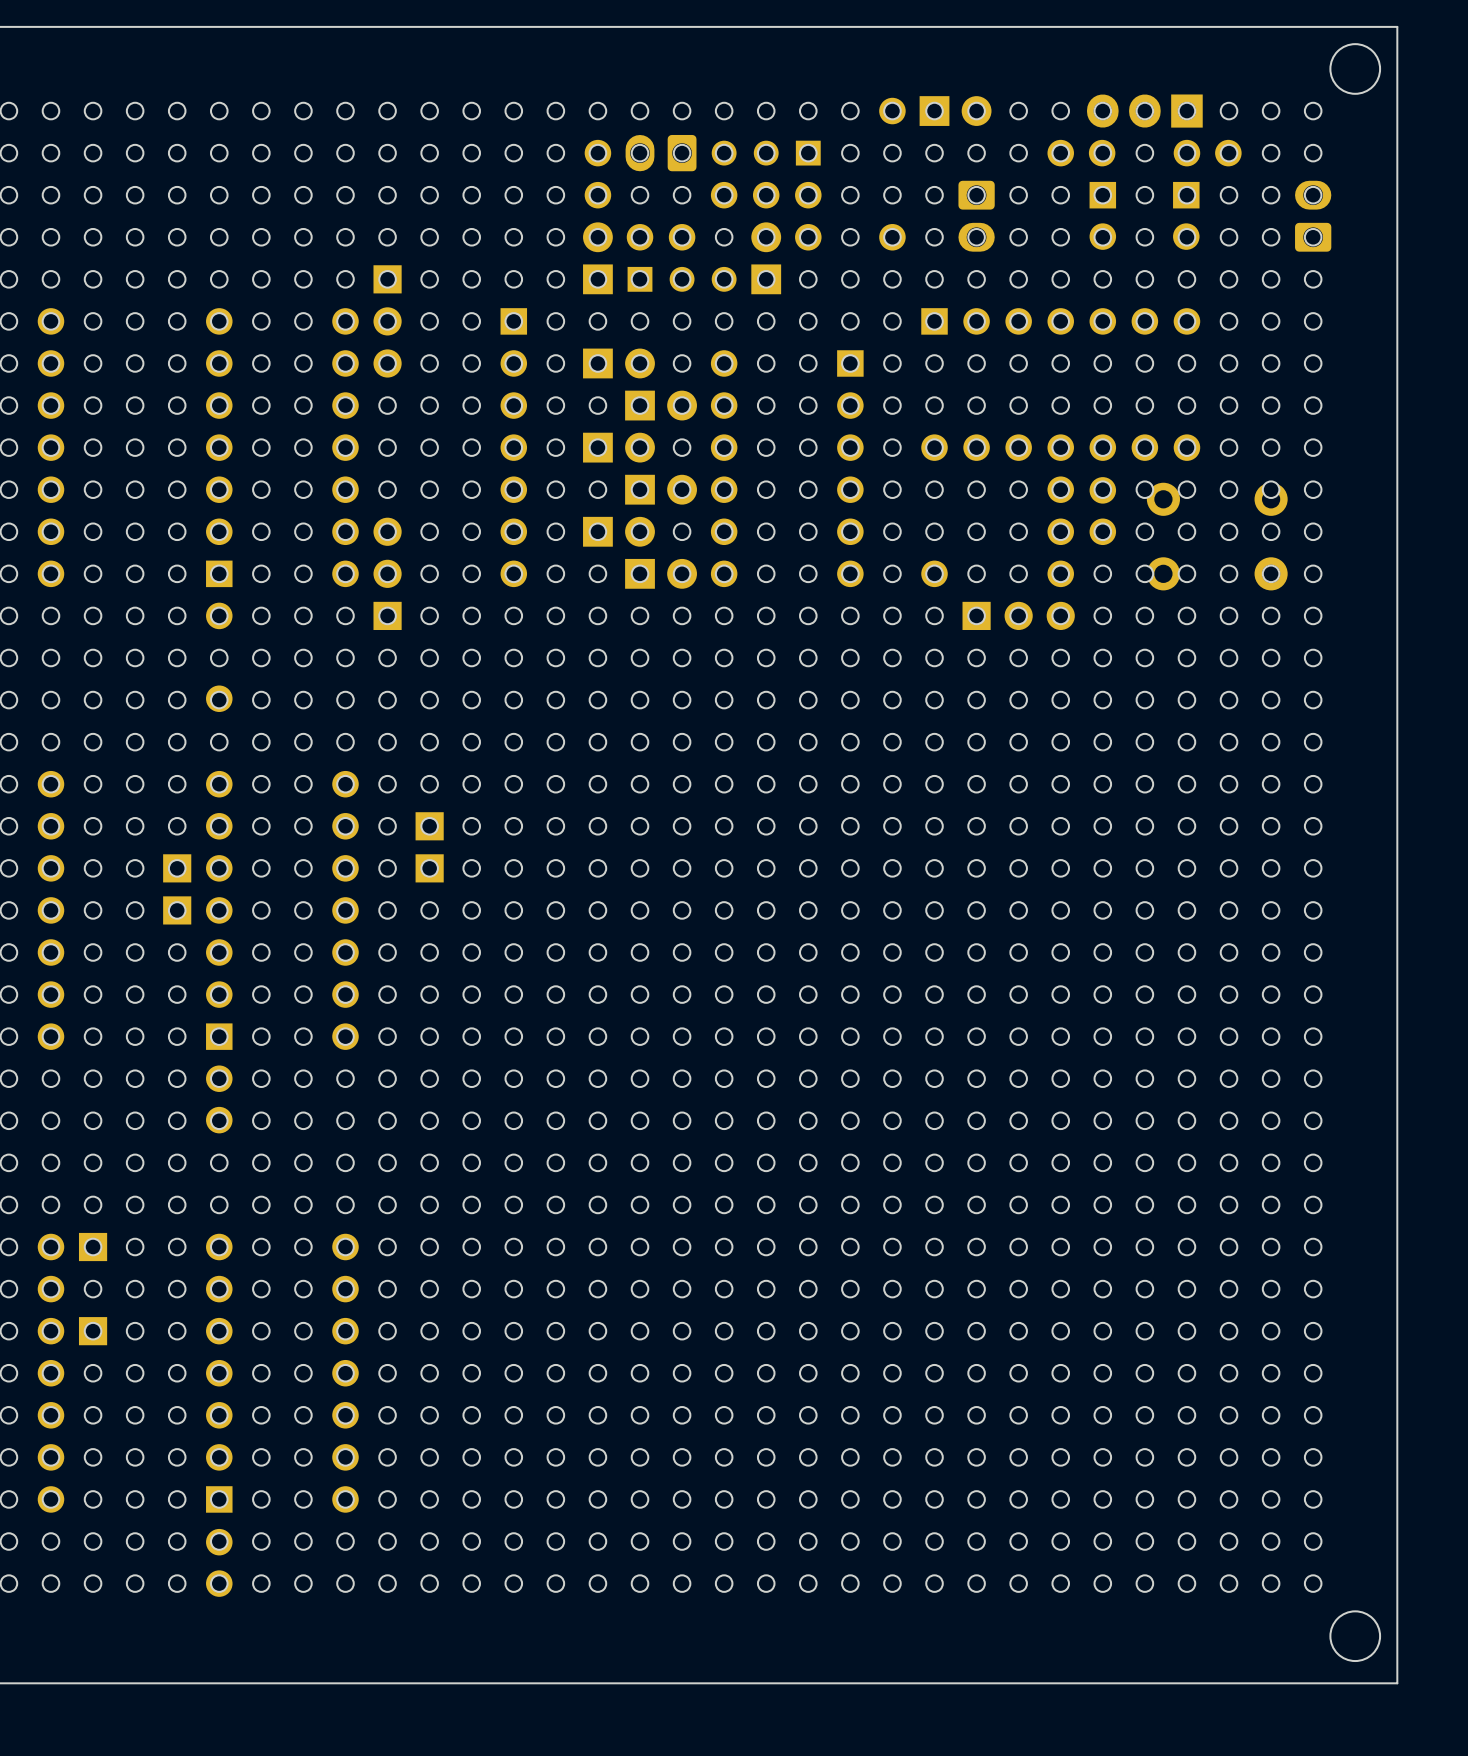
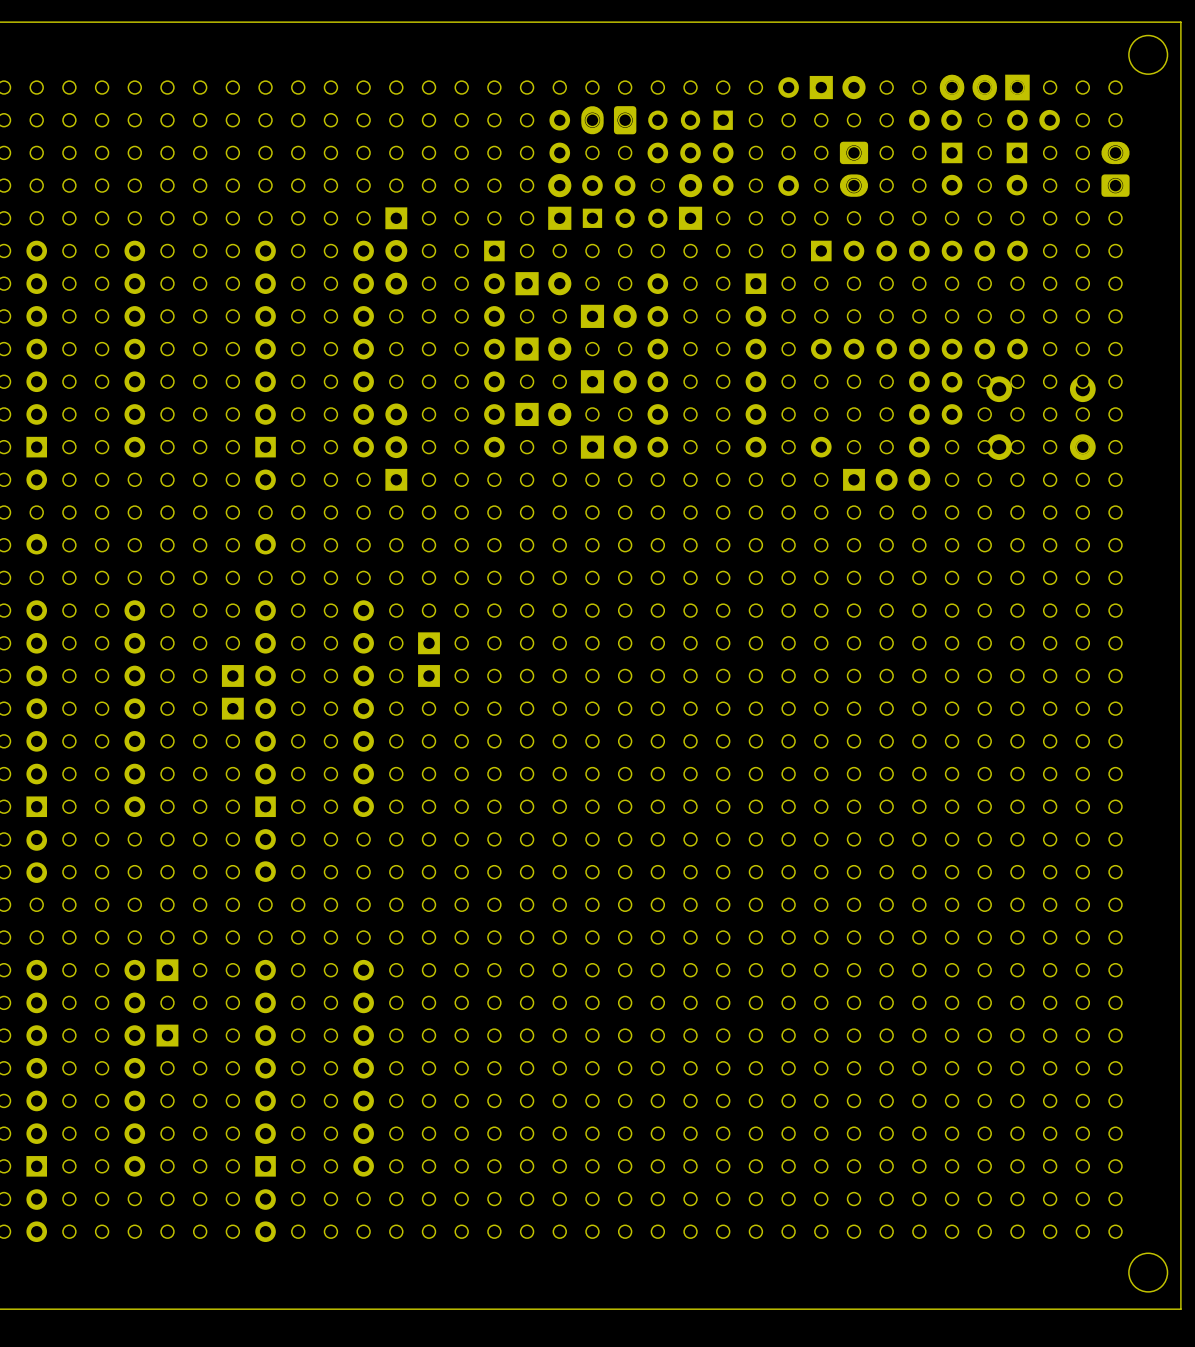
part position: (618, 363) -> (543, 283)
part position: (618, 447) -> (543, 349)
part position: (618, 531) -> (543, 414)

